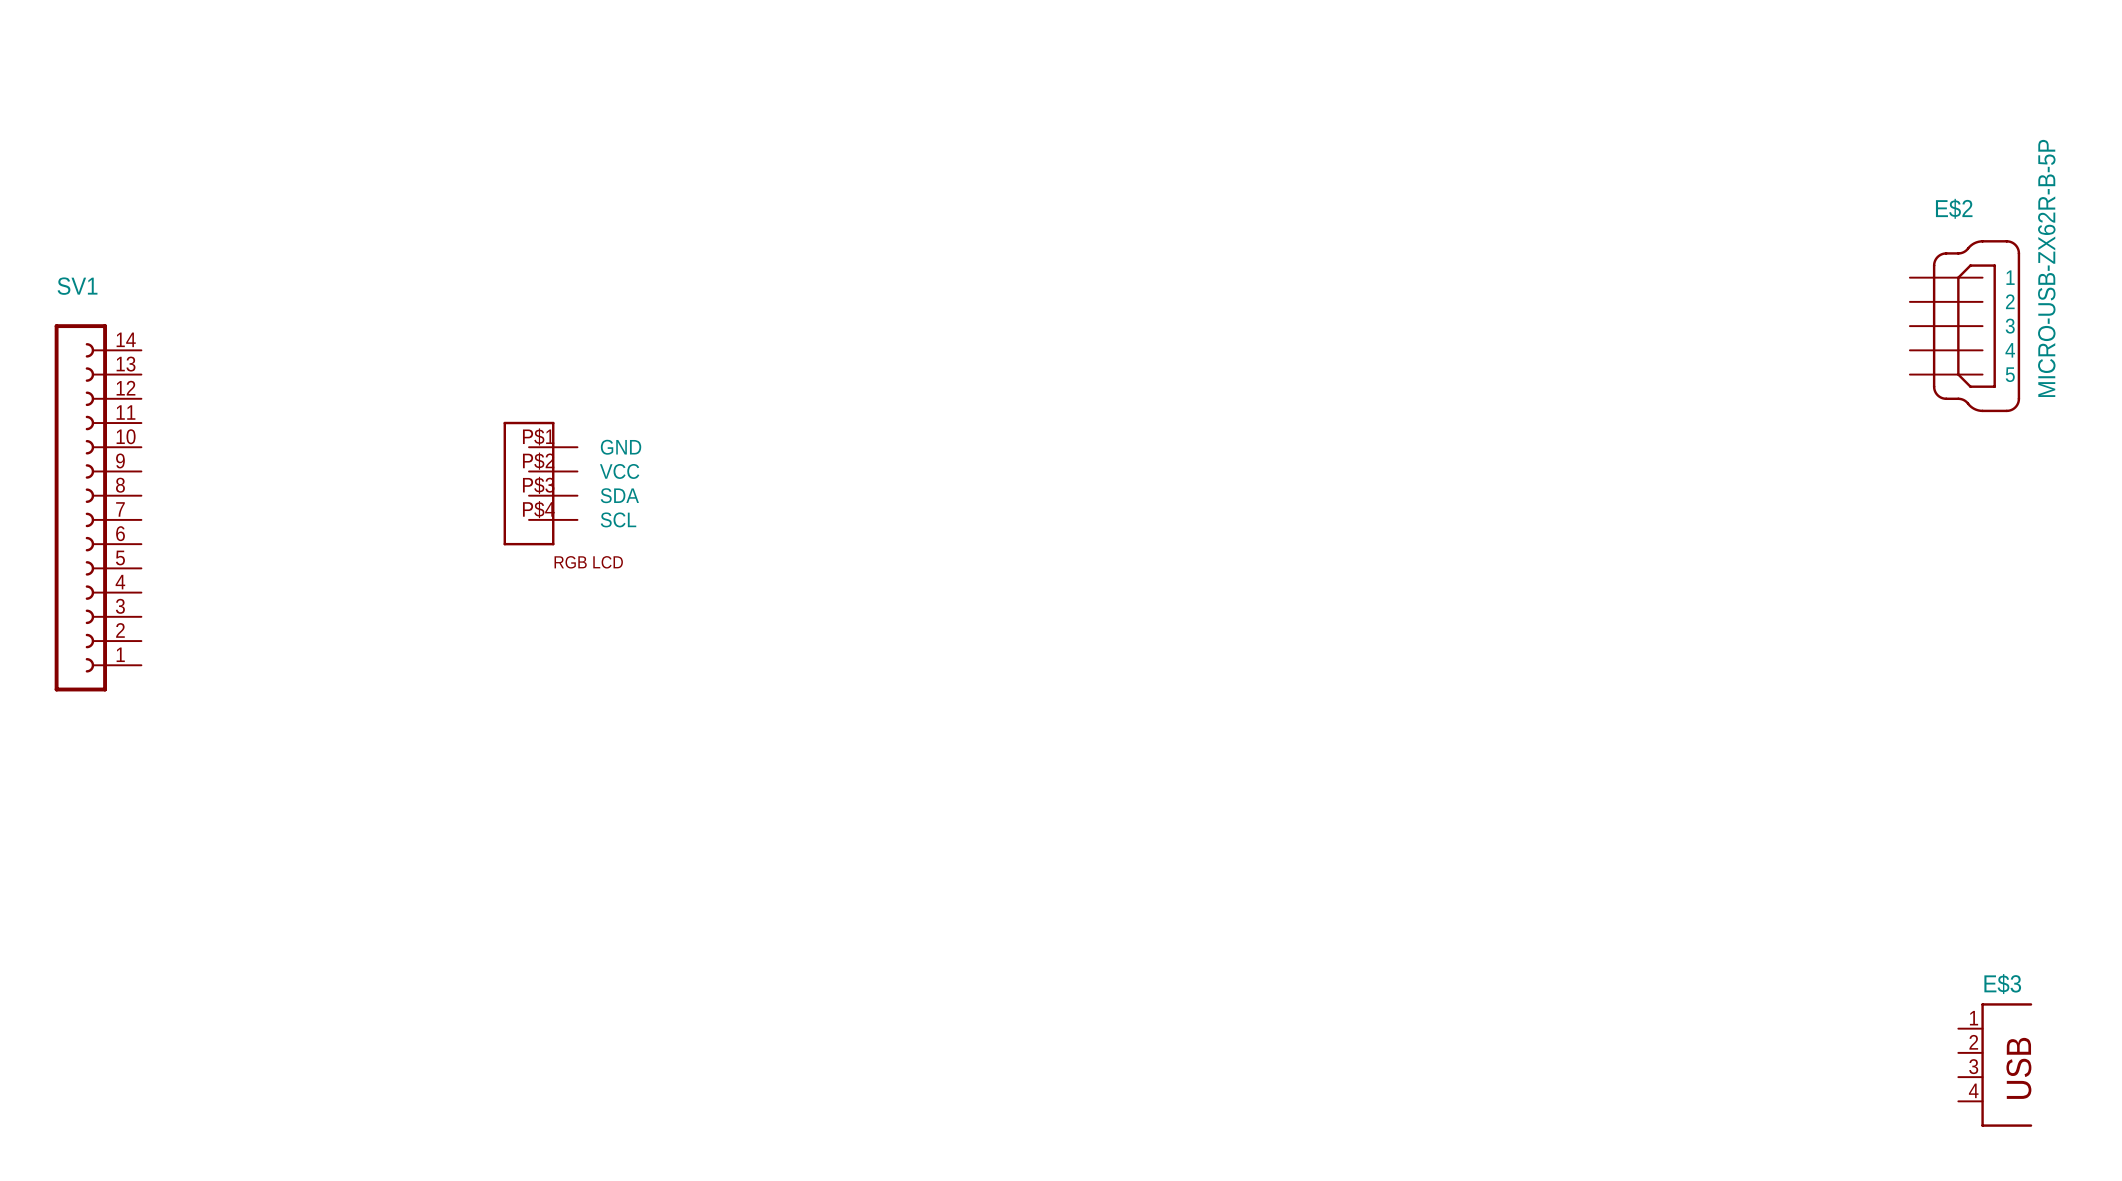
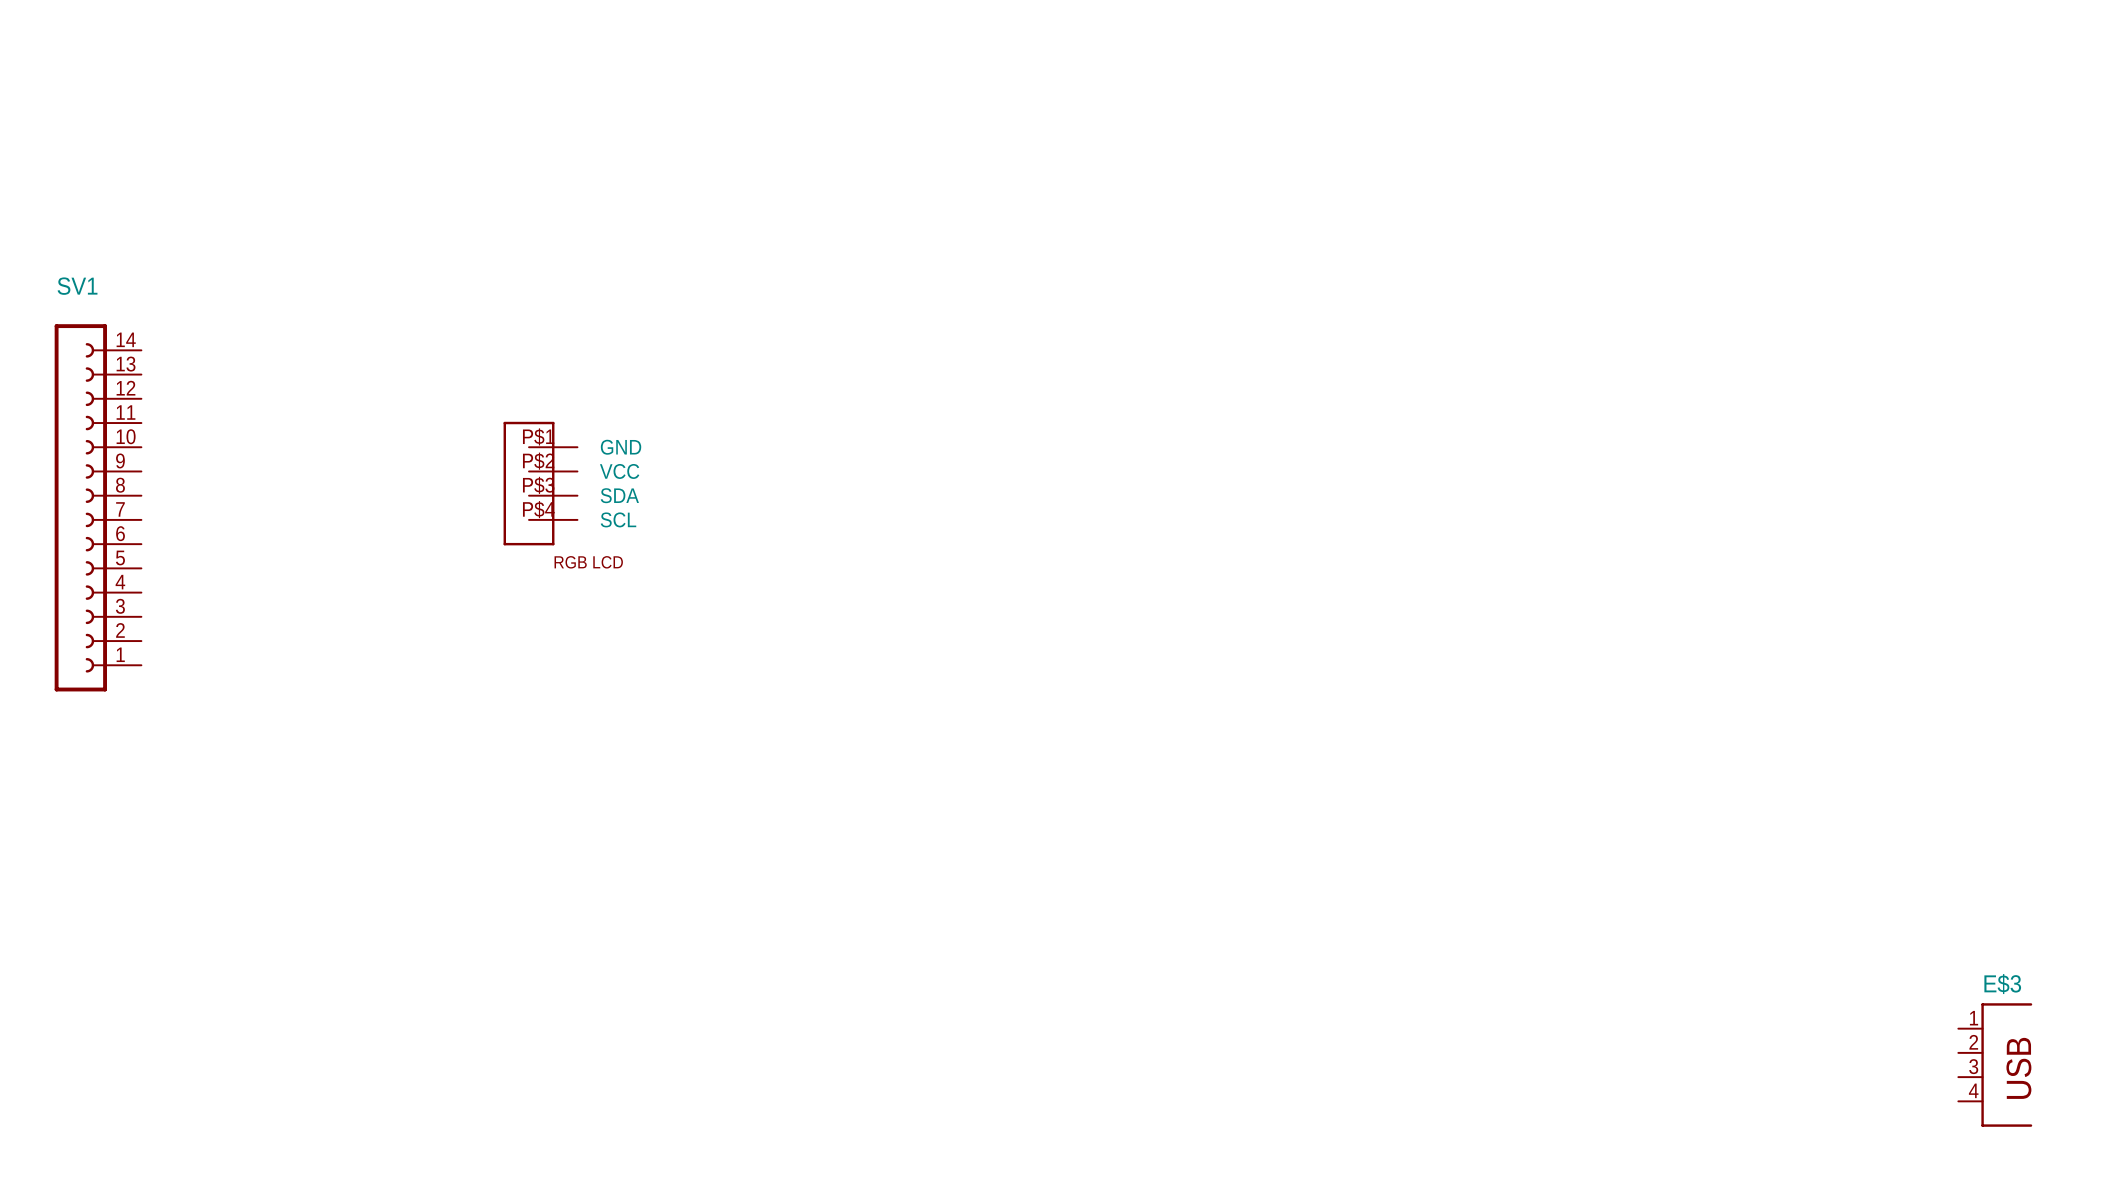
E$2: MICRO-USB-ZX62R-B-5P (1965, 326) -> none

